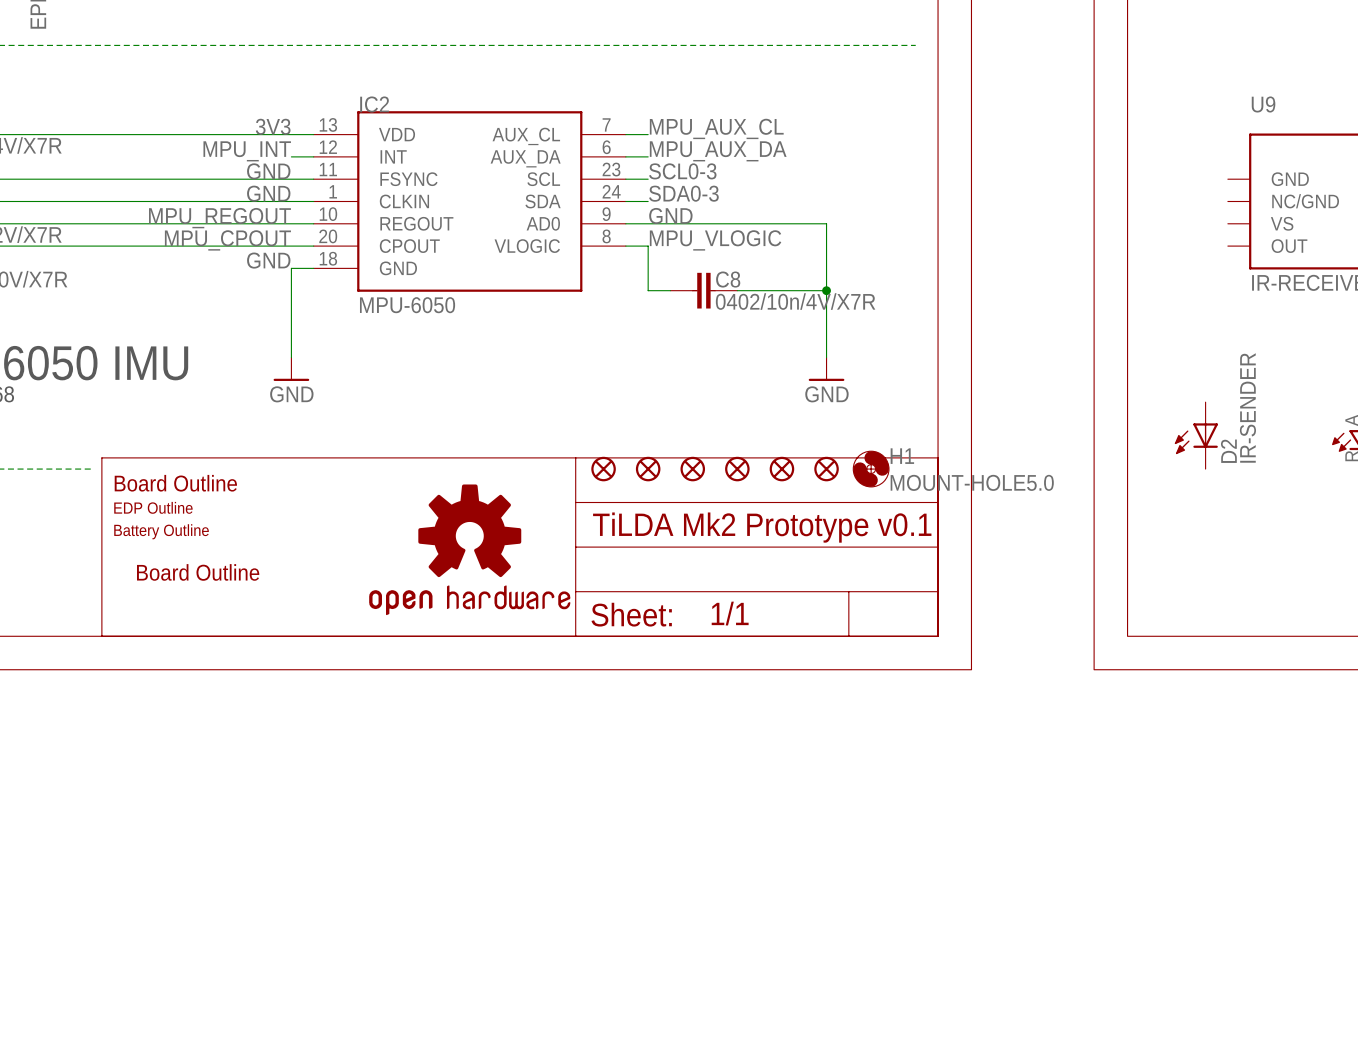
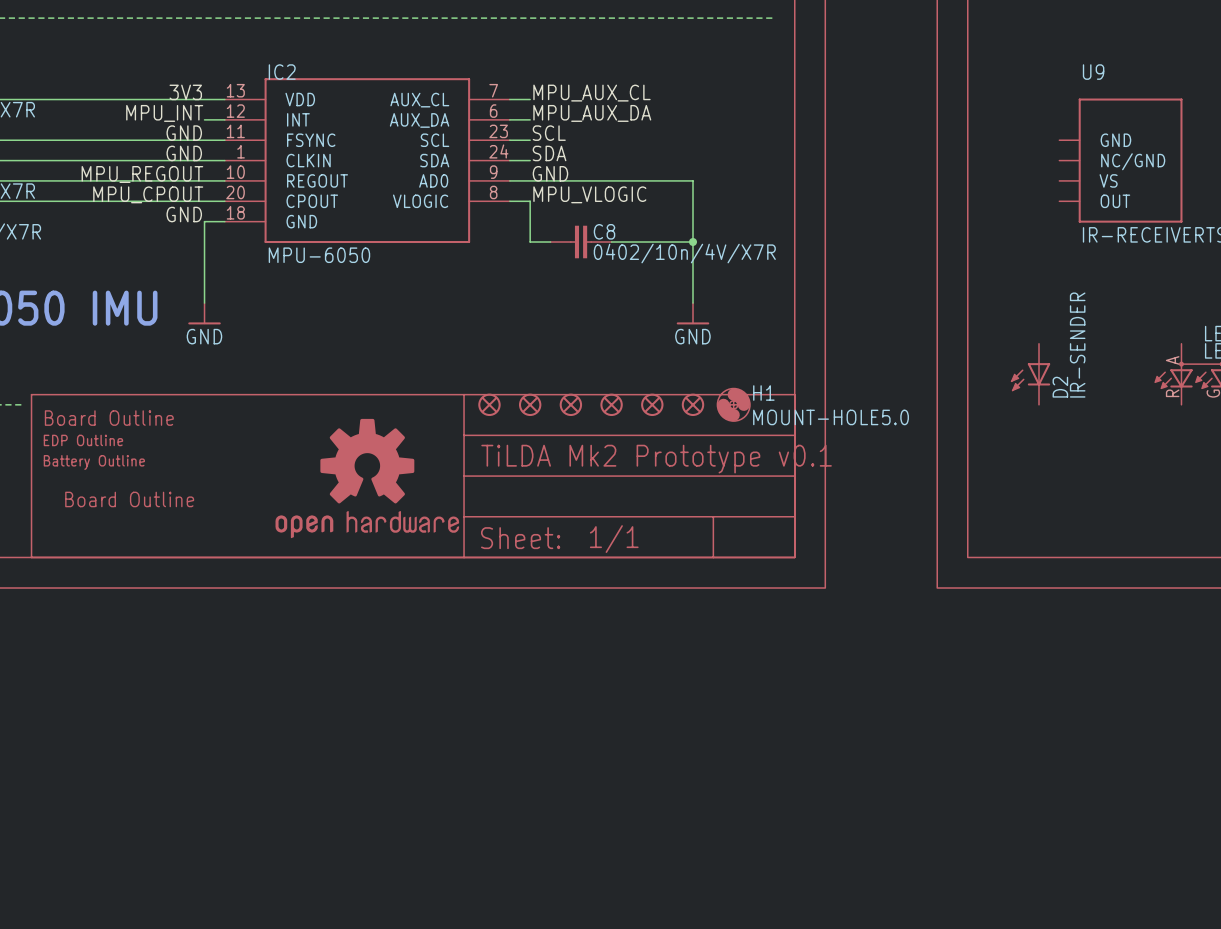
label: SCL0-3 (682, 171) -> SCL (549, 133)
label: SDA0-3 (683, 193) -> SDA (549, 153)

